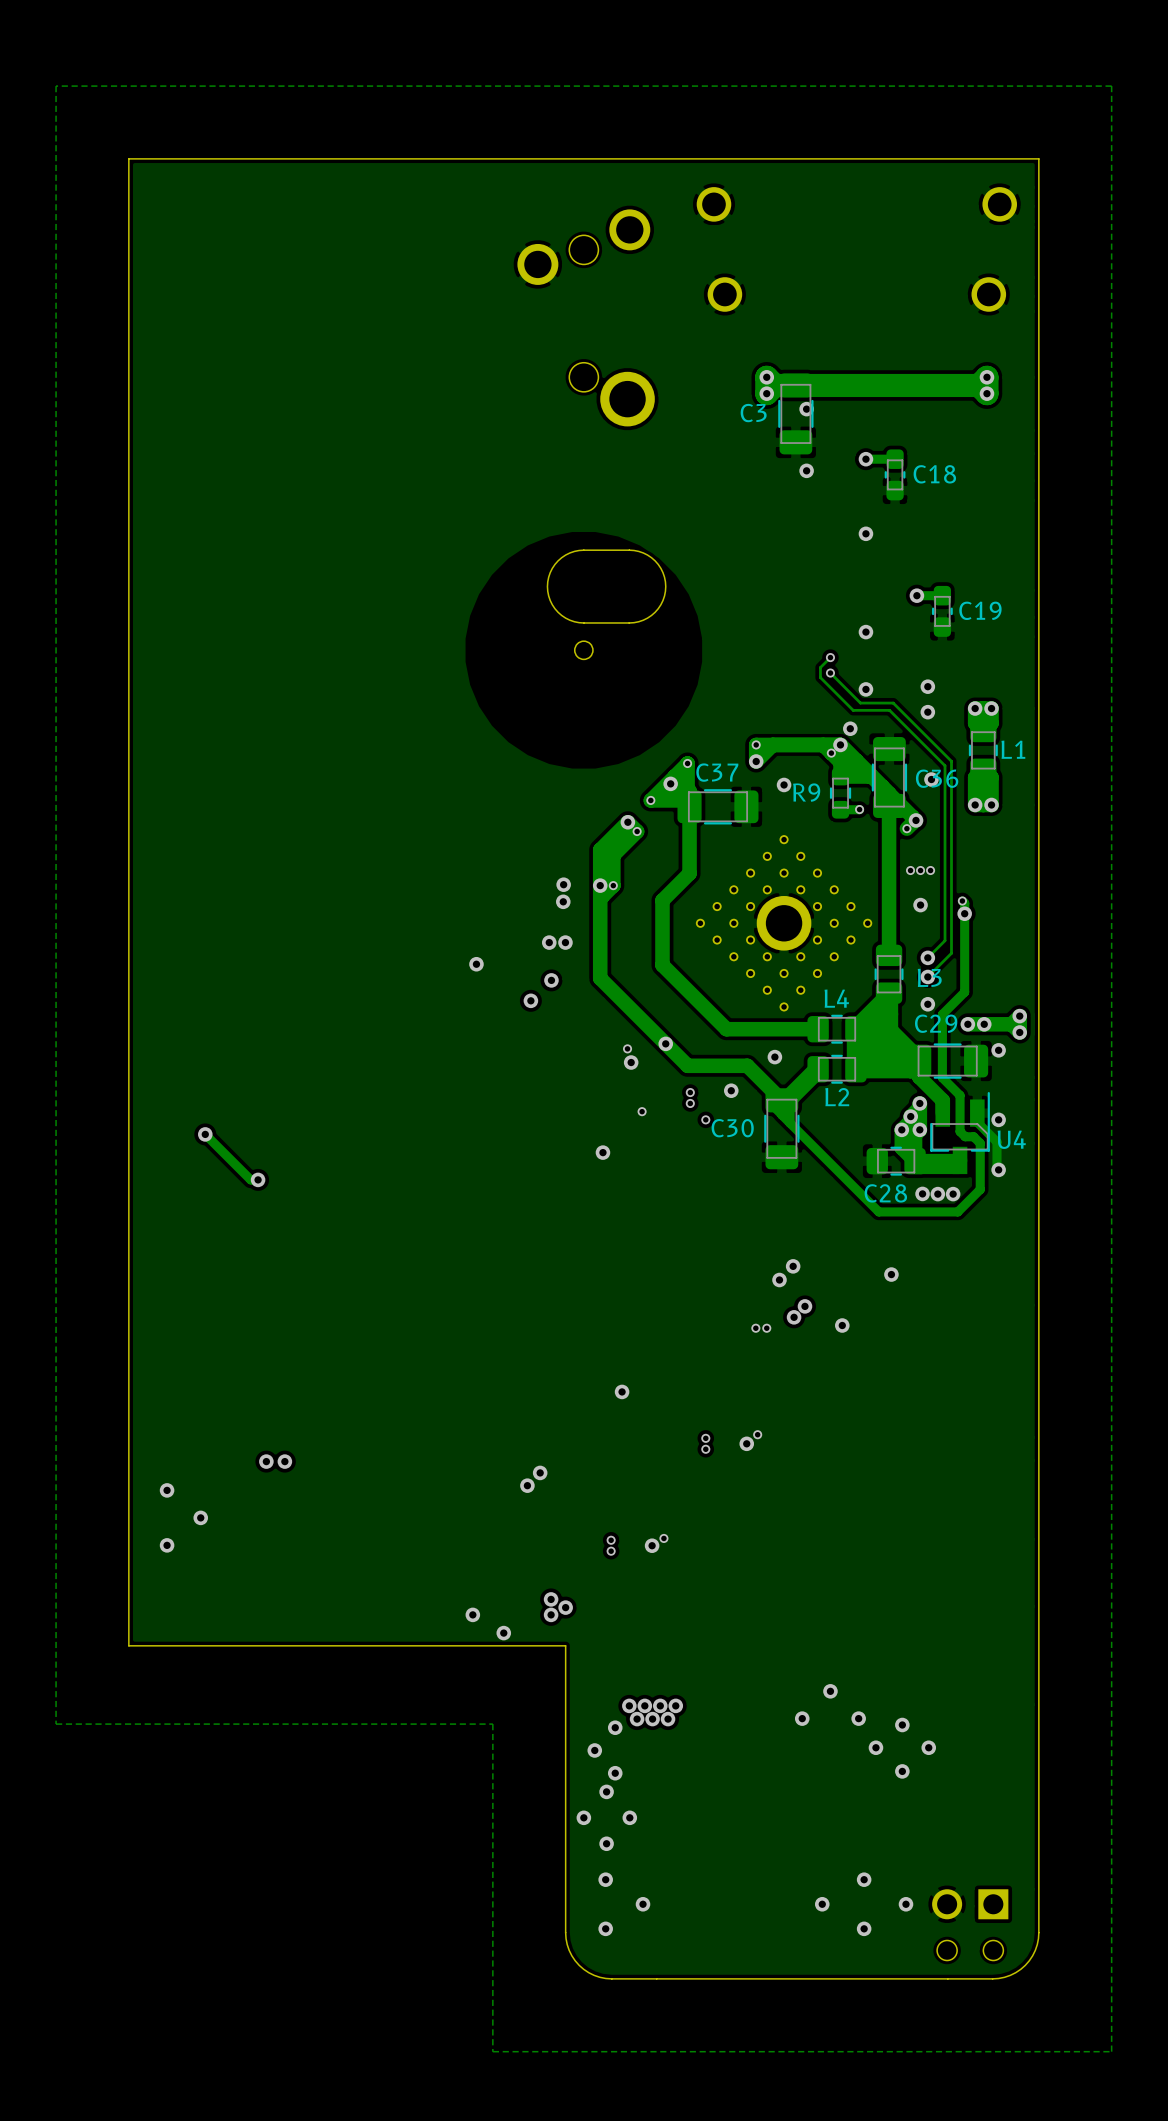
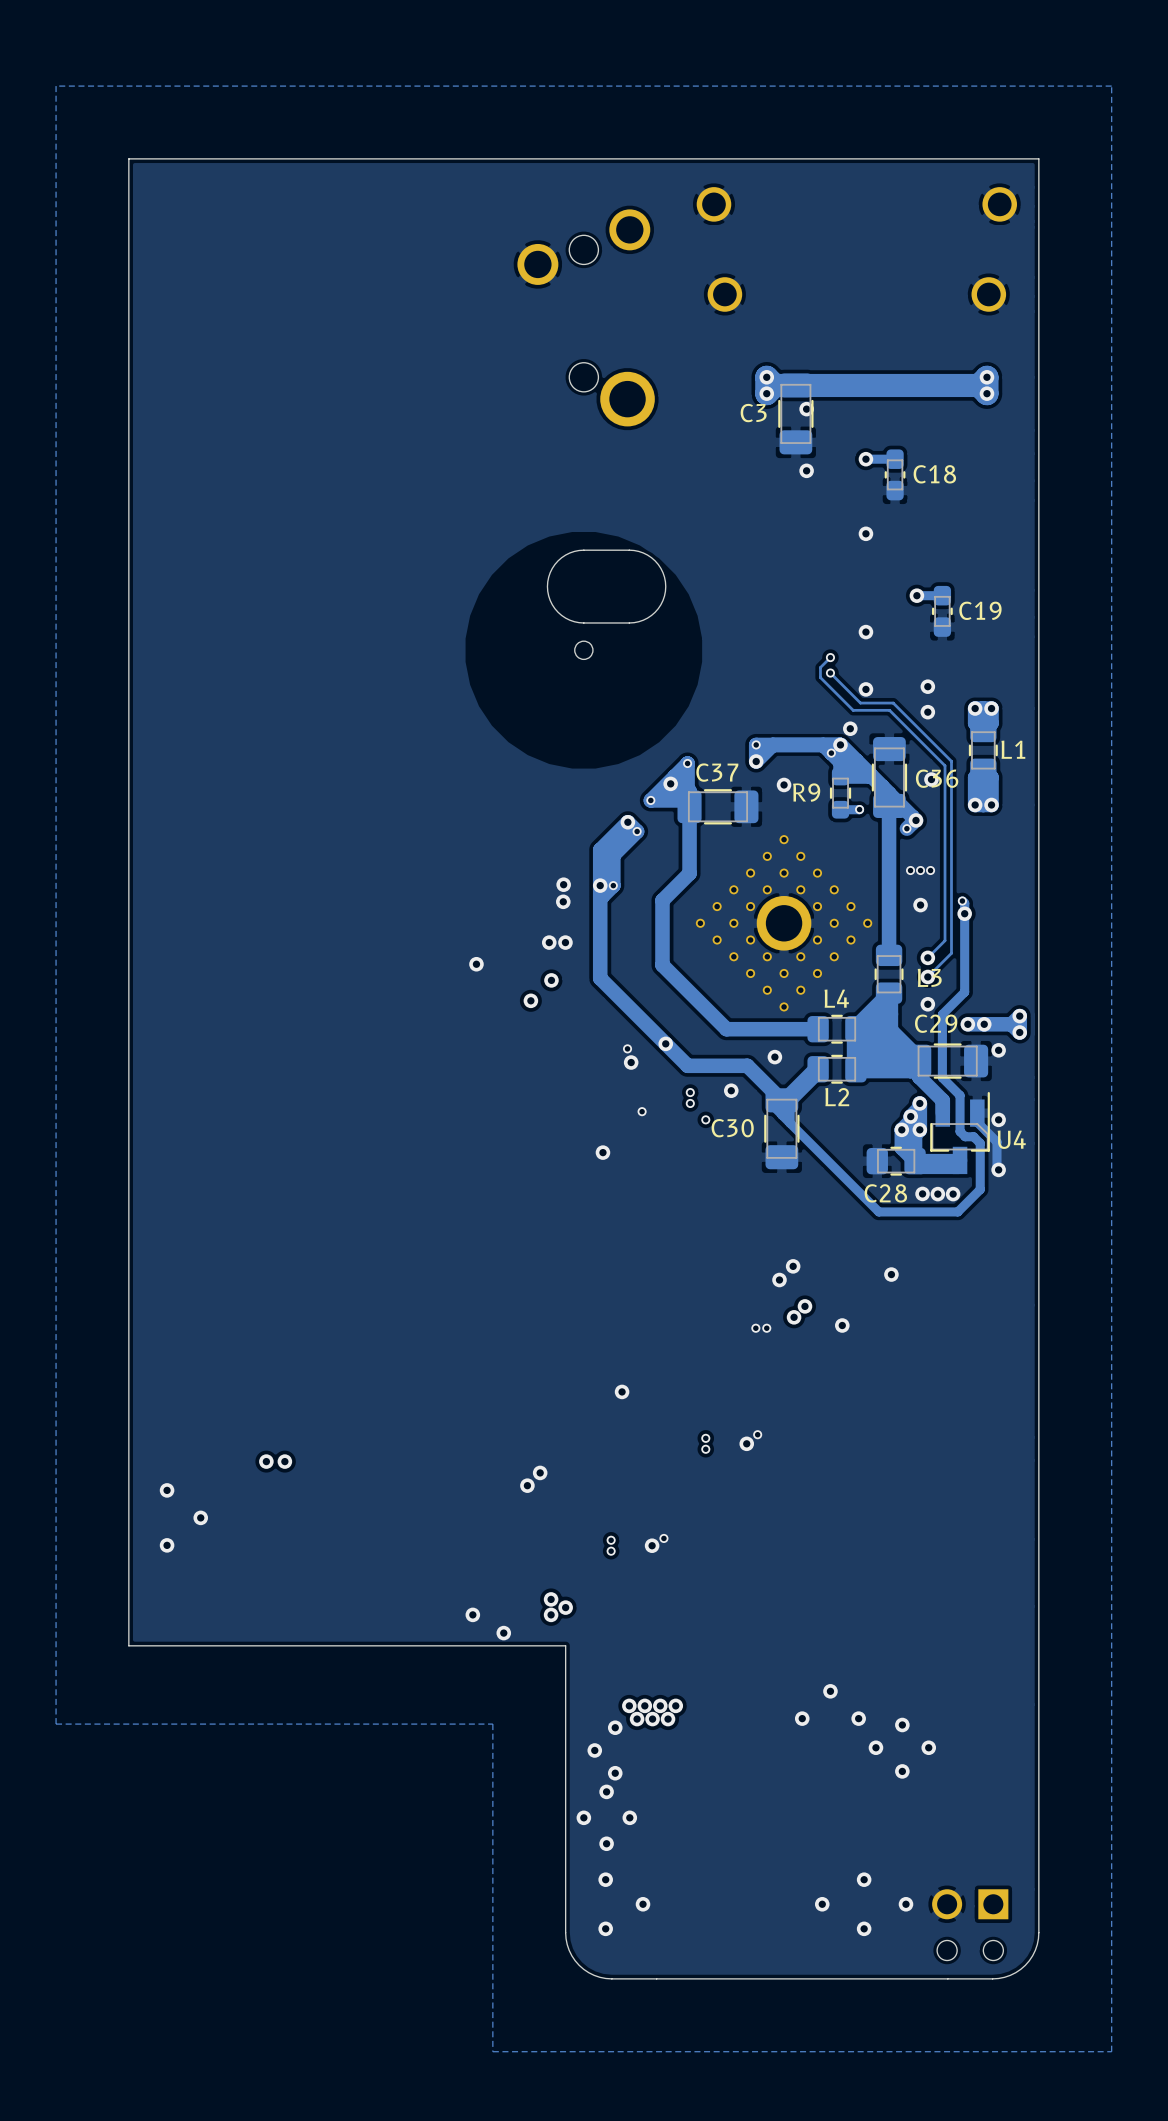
track: (205, 1134) (250, 1179) (258, 1179) -> none
via: (205, 1134) -> none
via: (258, 1179) -> none

